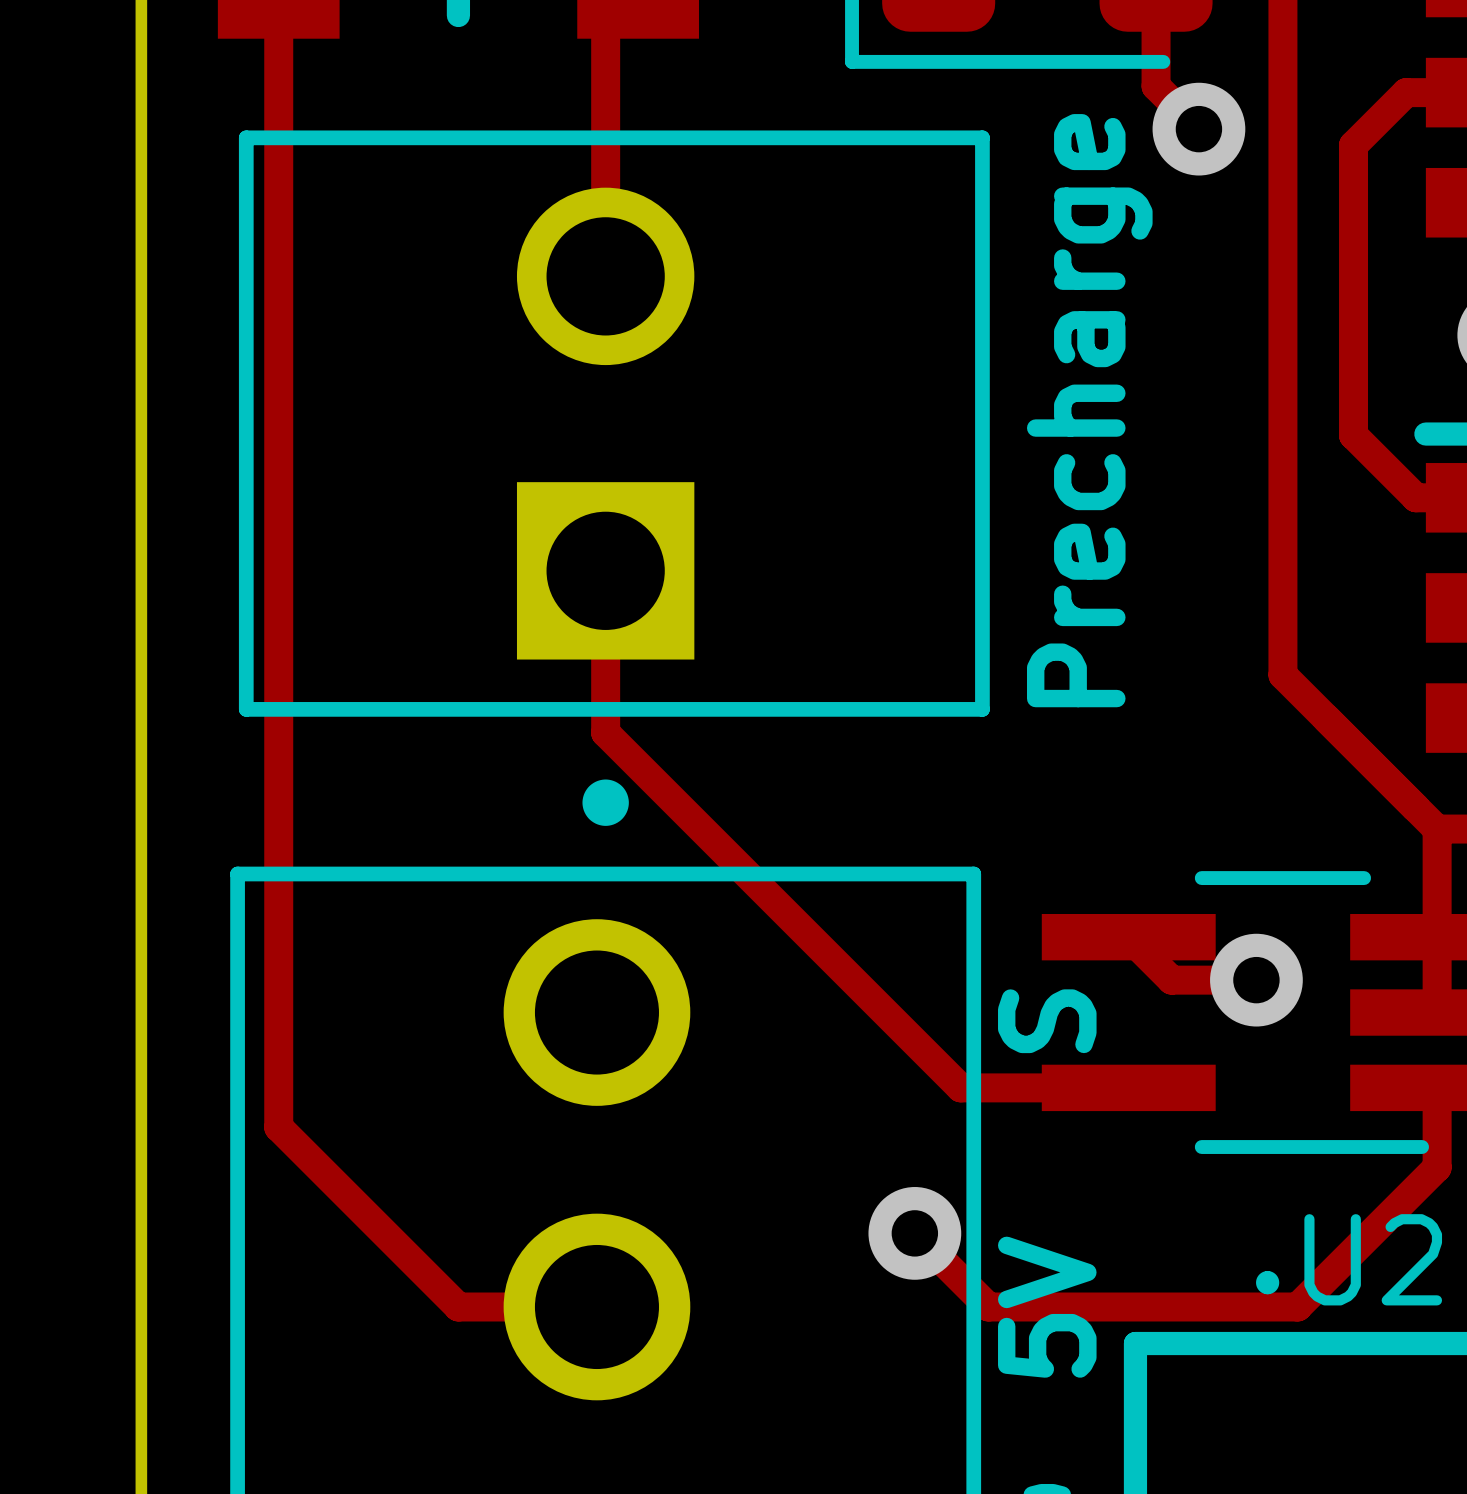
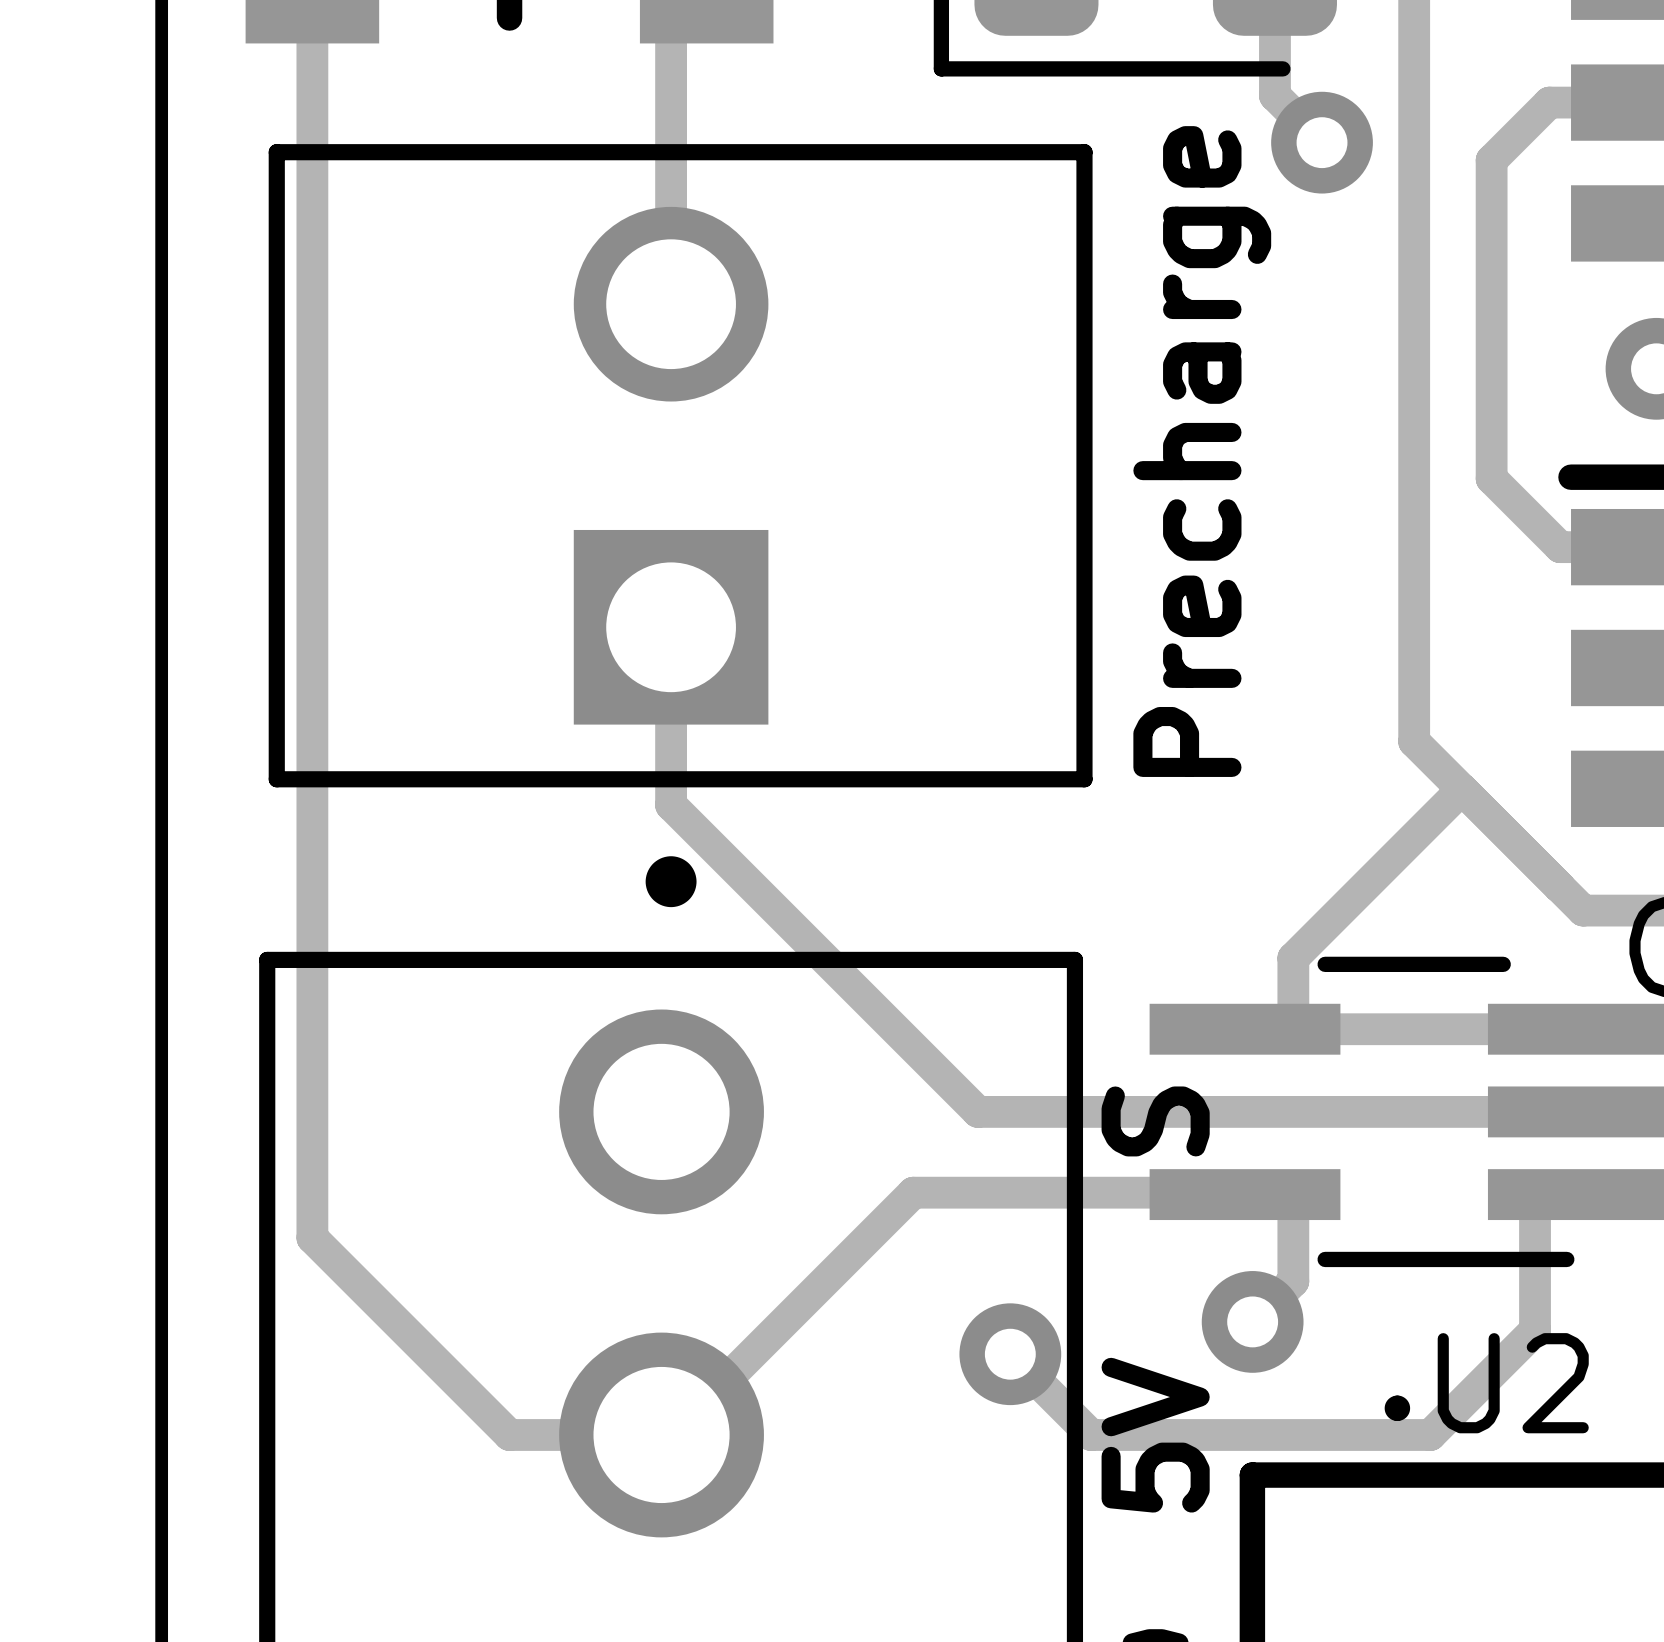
track: none -> (1462, 789) (1293, 958) (1293, 1029) (1535, 1029)
track: (1437, 829) (1437, 1012) -> none
track: (1128, 937) (1171, 980) (1256, 980) -> none
via position: (1256, 980) -> (1252, 1321)
track: (885, 1012) (960, 1087) (1128, 1087) -> (978, 1111) (1516, 1111)
track: none -> (1277, 1192) (913, 1192) (671, 1434)
track: none -> (1293, 1194) (1293, 1281) (1252, 1321)
track: (1437, 1087) (1437, 1167) (1393, 1211) -> (1535, 1194) (1535, 1330)

